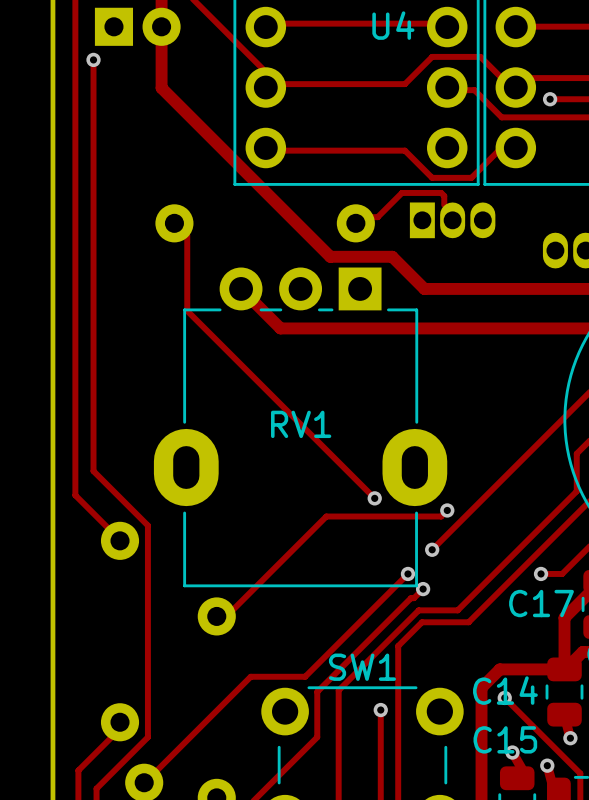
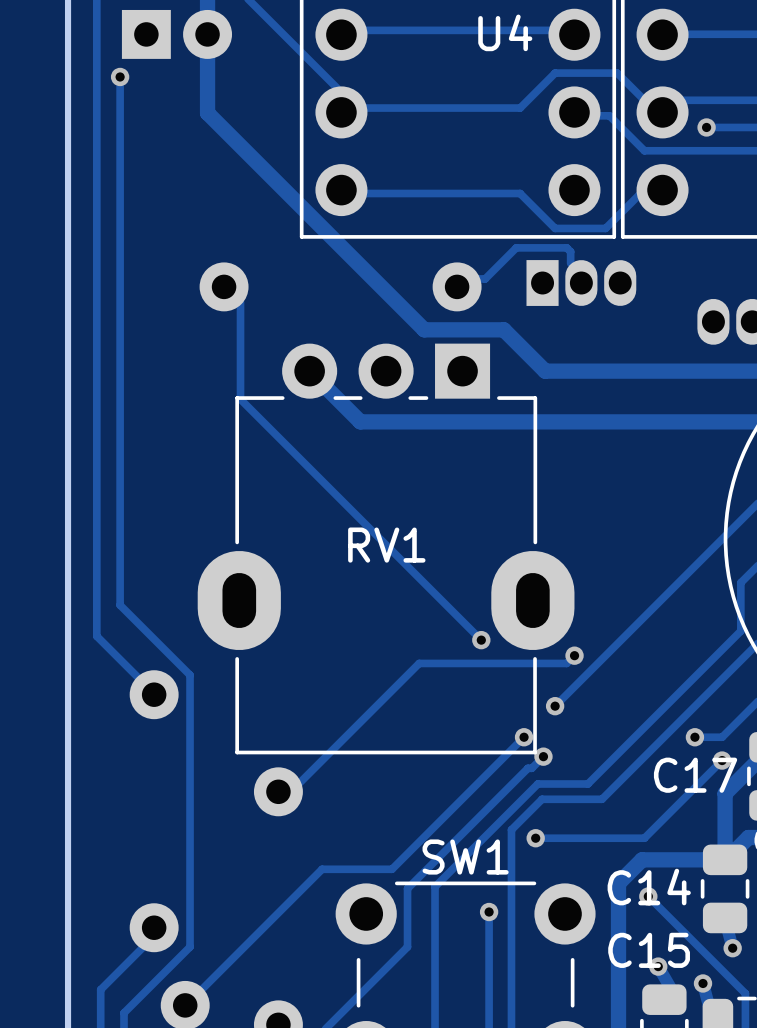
track: none -> (722, 760) (644, 838) (535, 838)
via: none -> (722, 760)
via: none -> (535, 838)

